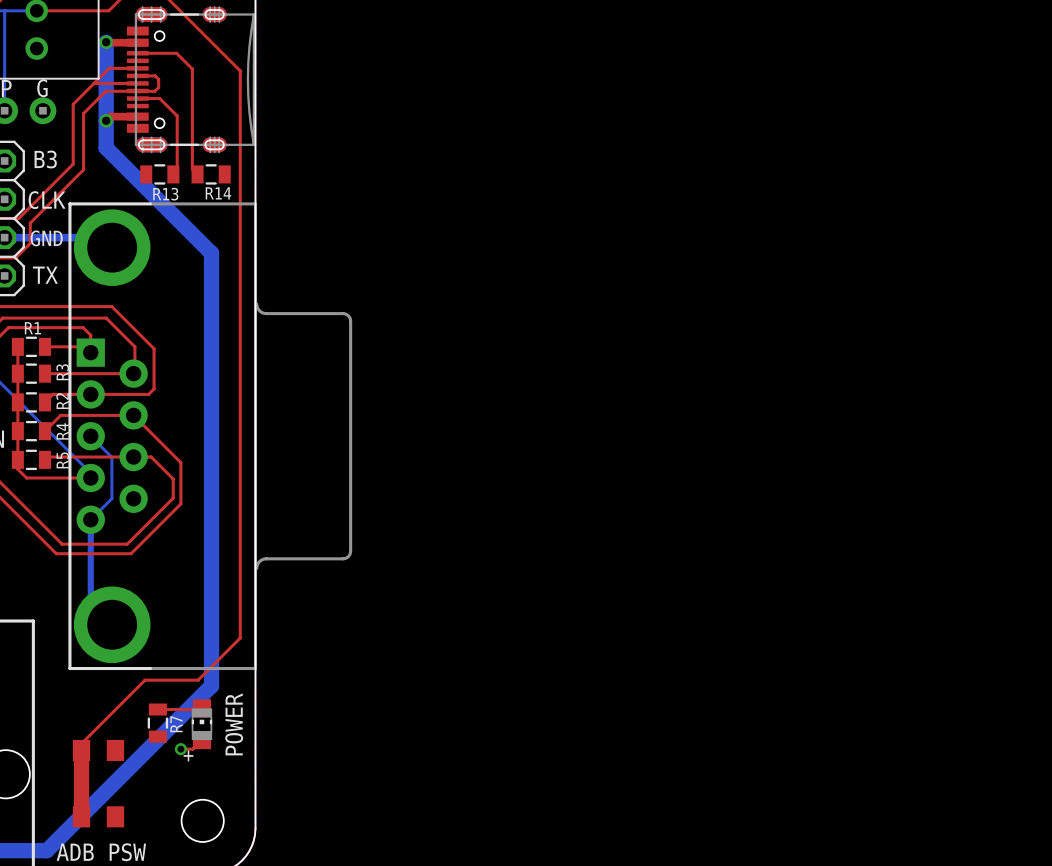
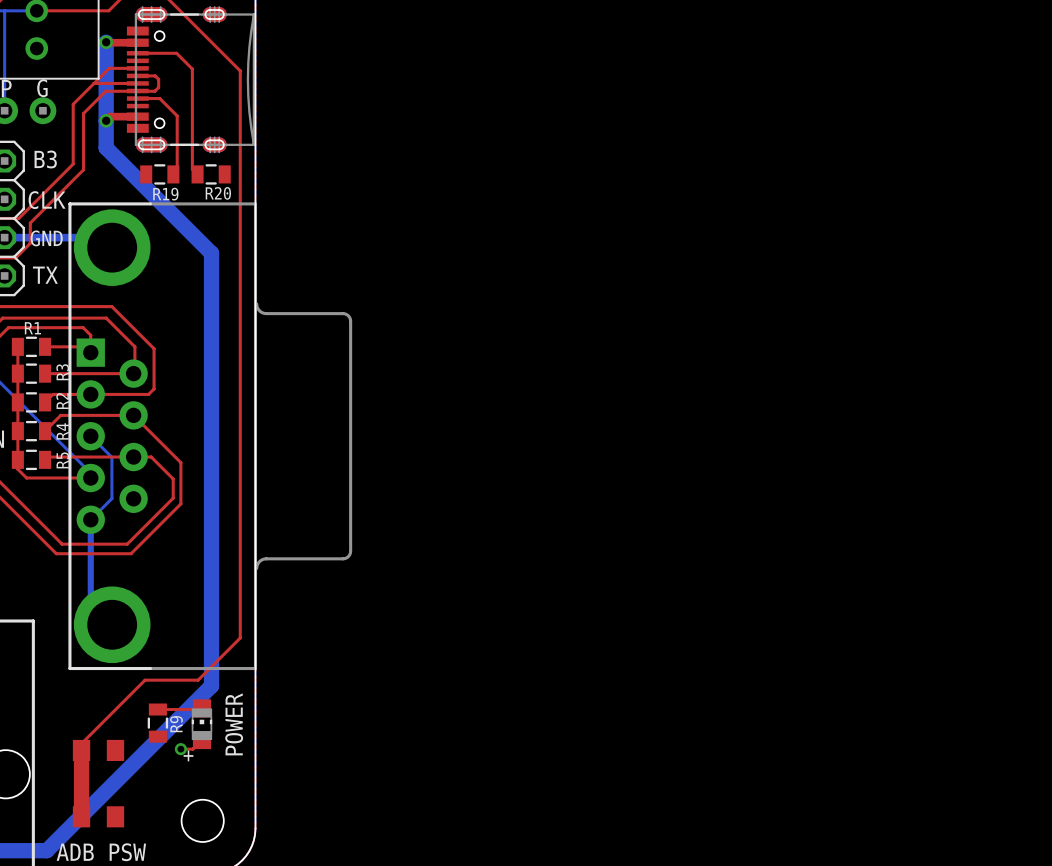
R14 name: R14 (218, 193) -> R20 (218, 193)
R13 name: R13 (165, 194) -> R19 (165, 194)
R7 name: R7 (176, 724) -> R9 (176, 724)

